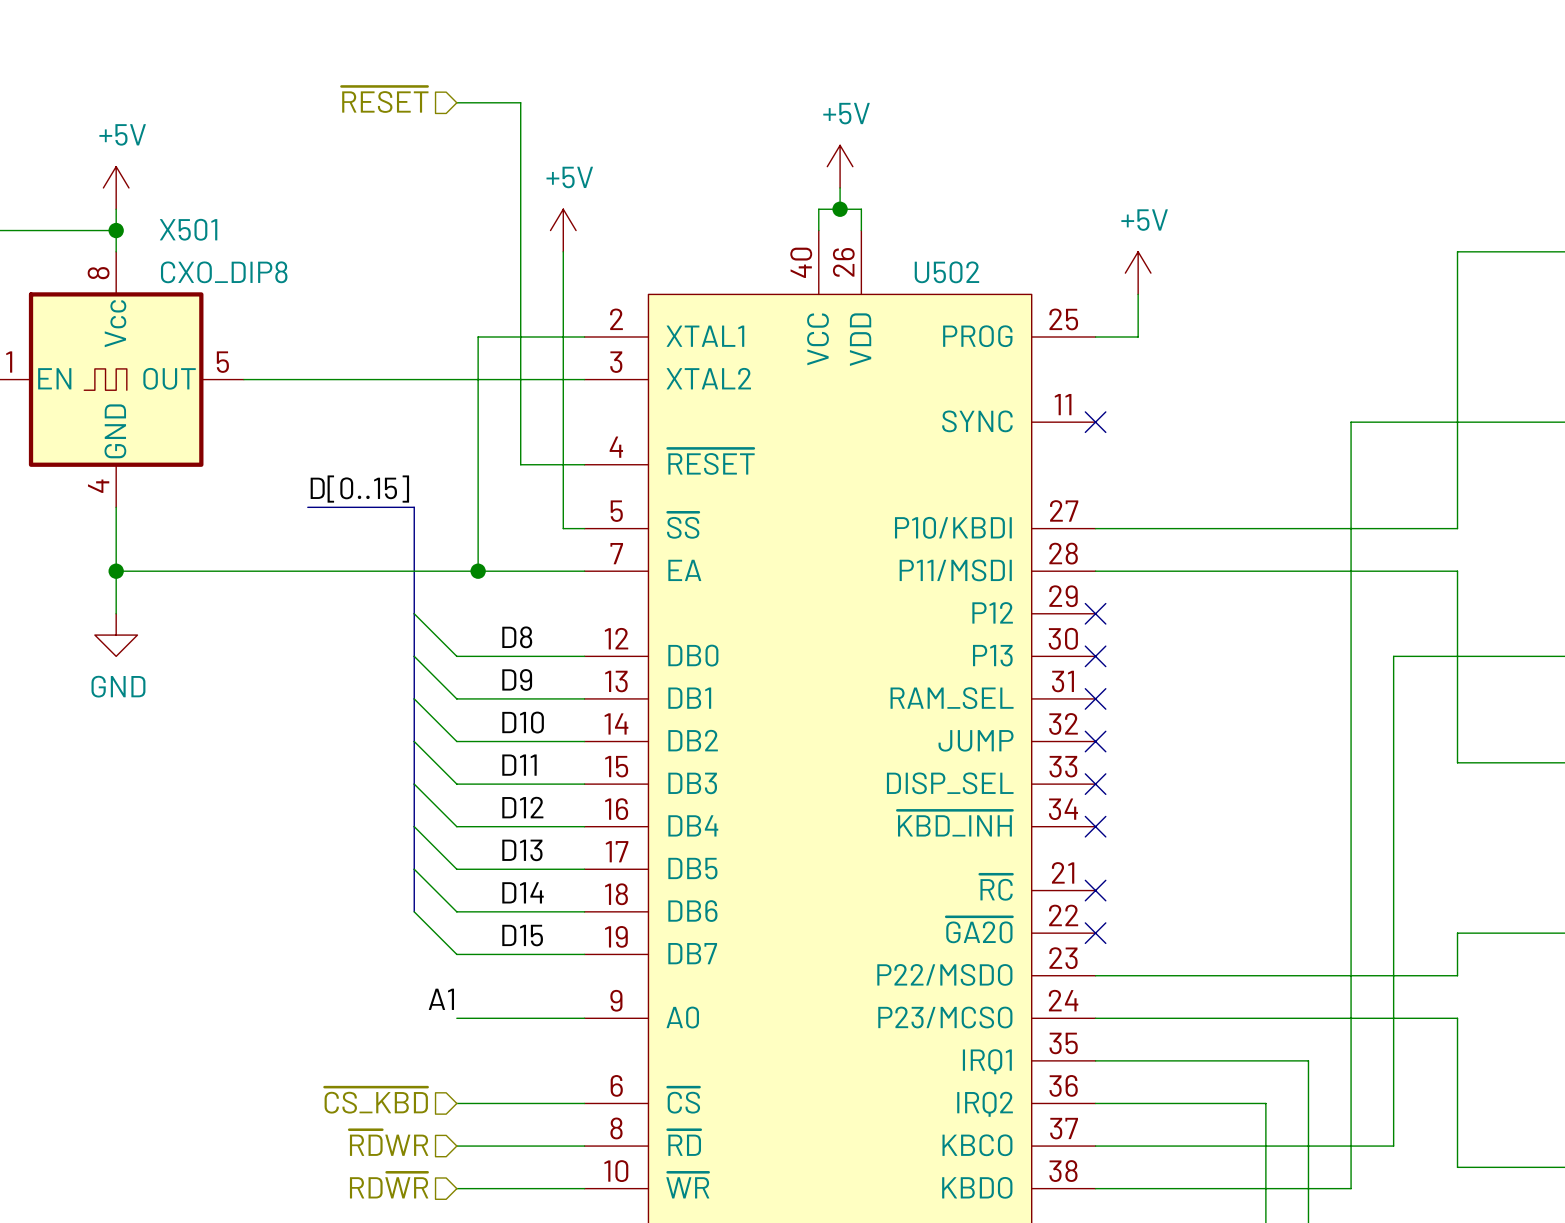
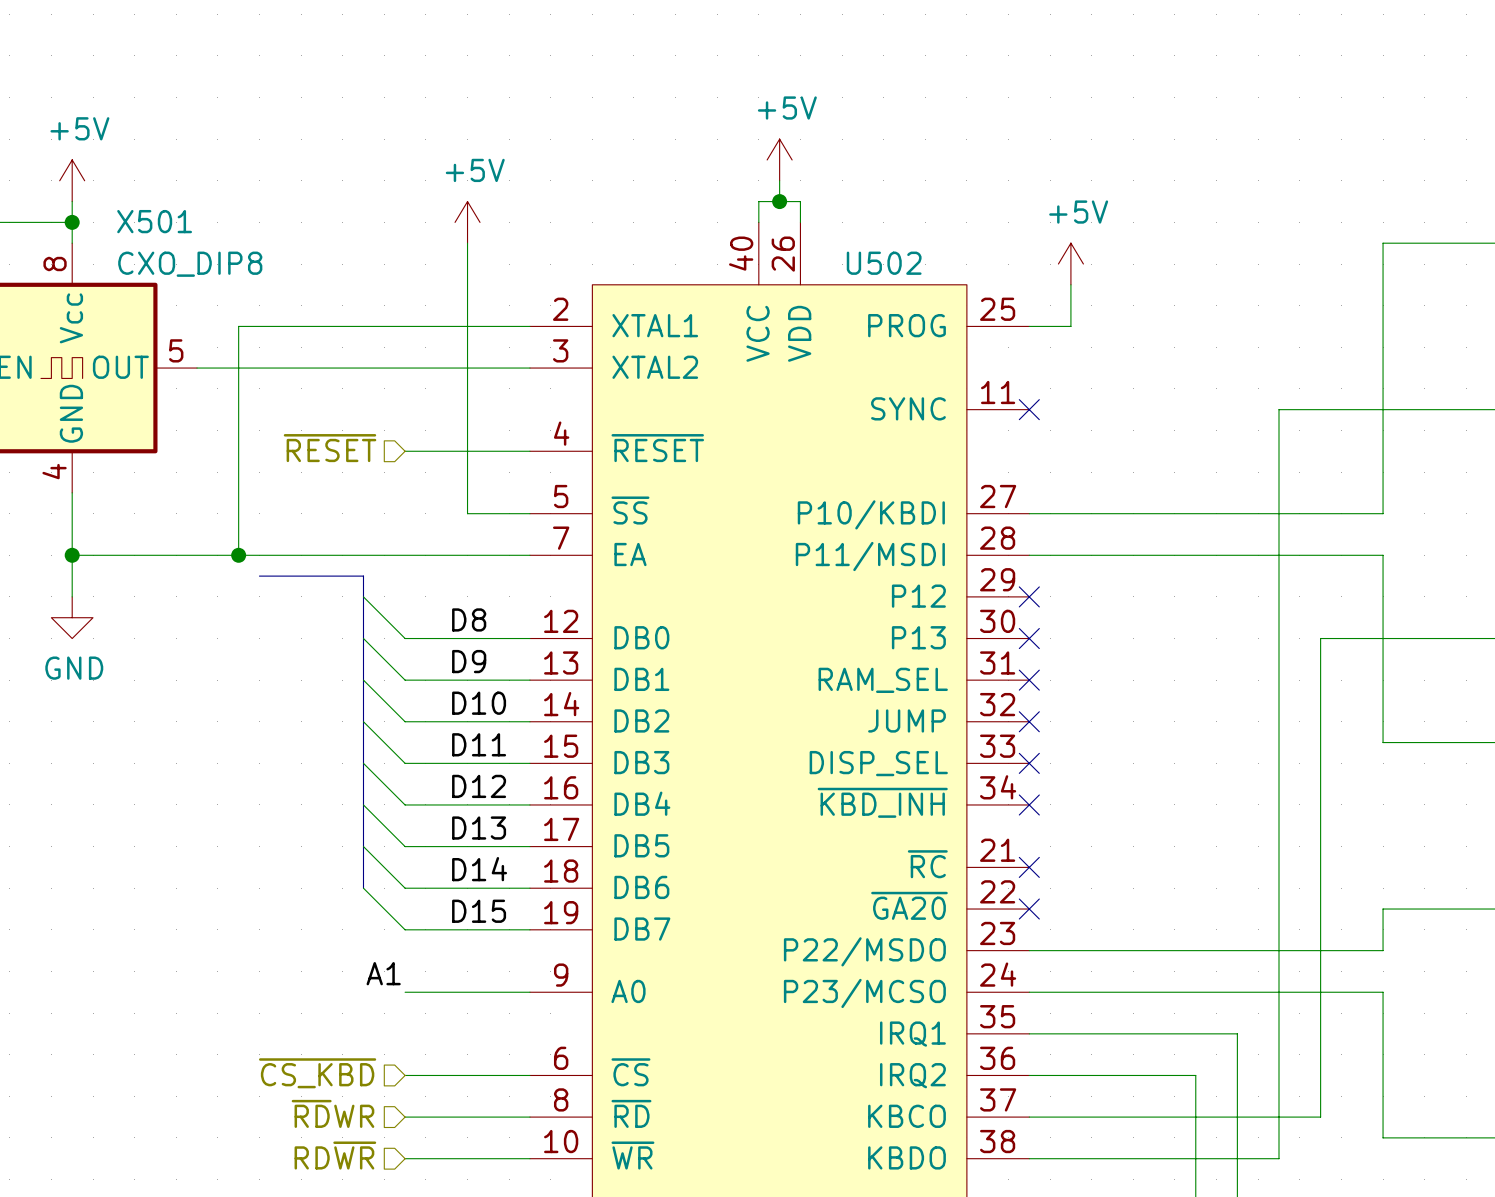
hierarchical label position: ~{RESET} (384, 99) -> ~{RESET} (330, 448)
wire: (456, 102) (520, 102) (520, 251) -> none
power symbol position: +5V (563, 230) -> +5V (467, 222)
wire: (563, 251) (563, 528) -> (405, 451) (467, 451) (467, 513) (509, 513)
wire: (478, 336) (478, 571) -> (425, 326) (238, 326) (238, 555)
label: D[0..15] (359, 489) -> none
bus: (307, 507) (414, 507) (414, 592) -> (259, 576) (363, 576)
junction: none -> (238, 555)
junction: (478, 571) -> none

